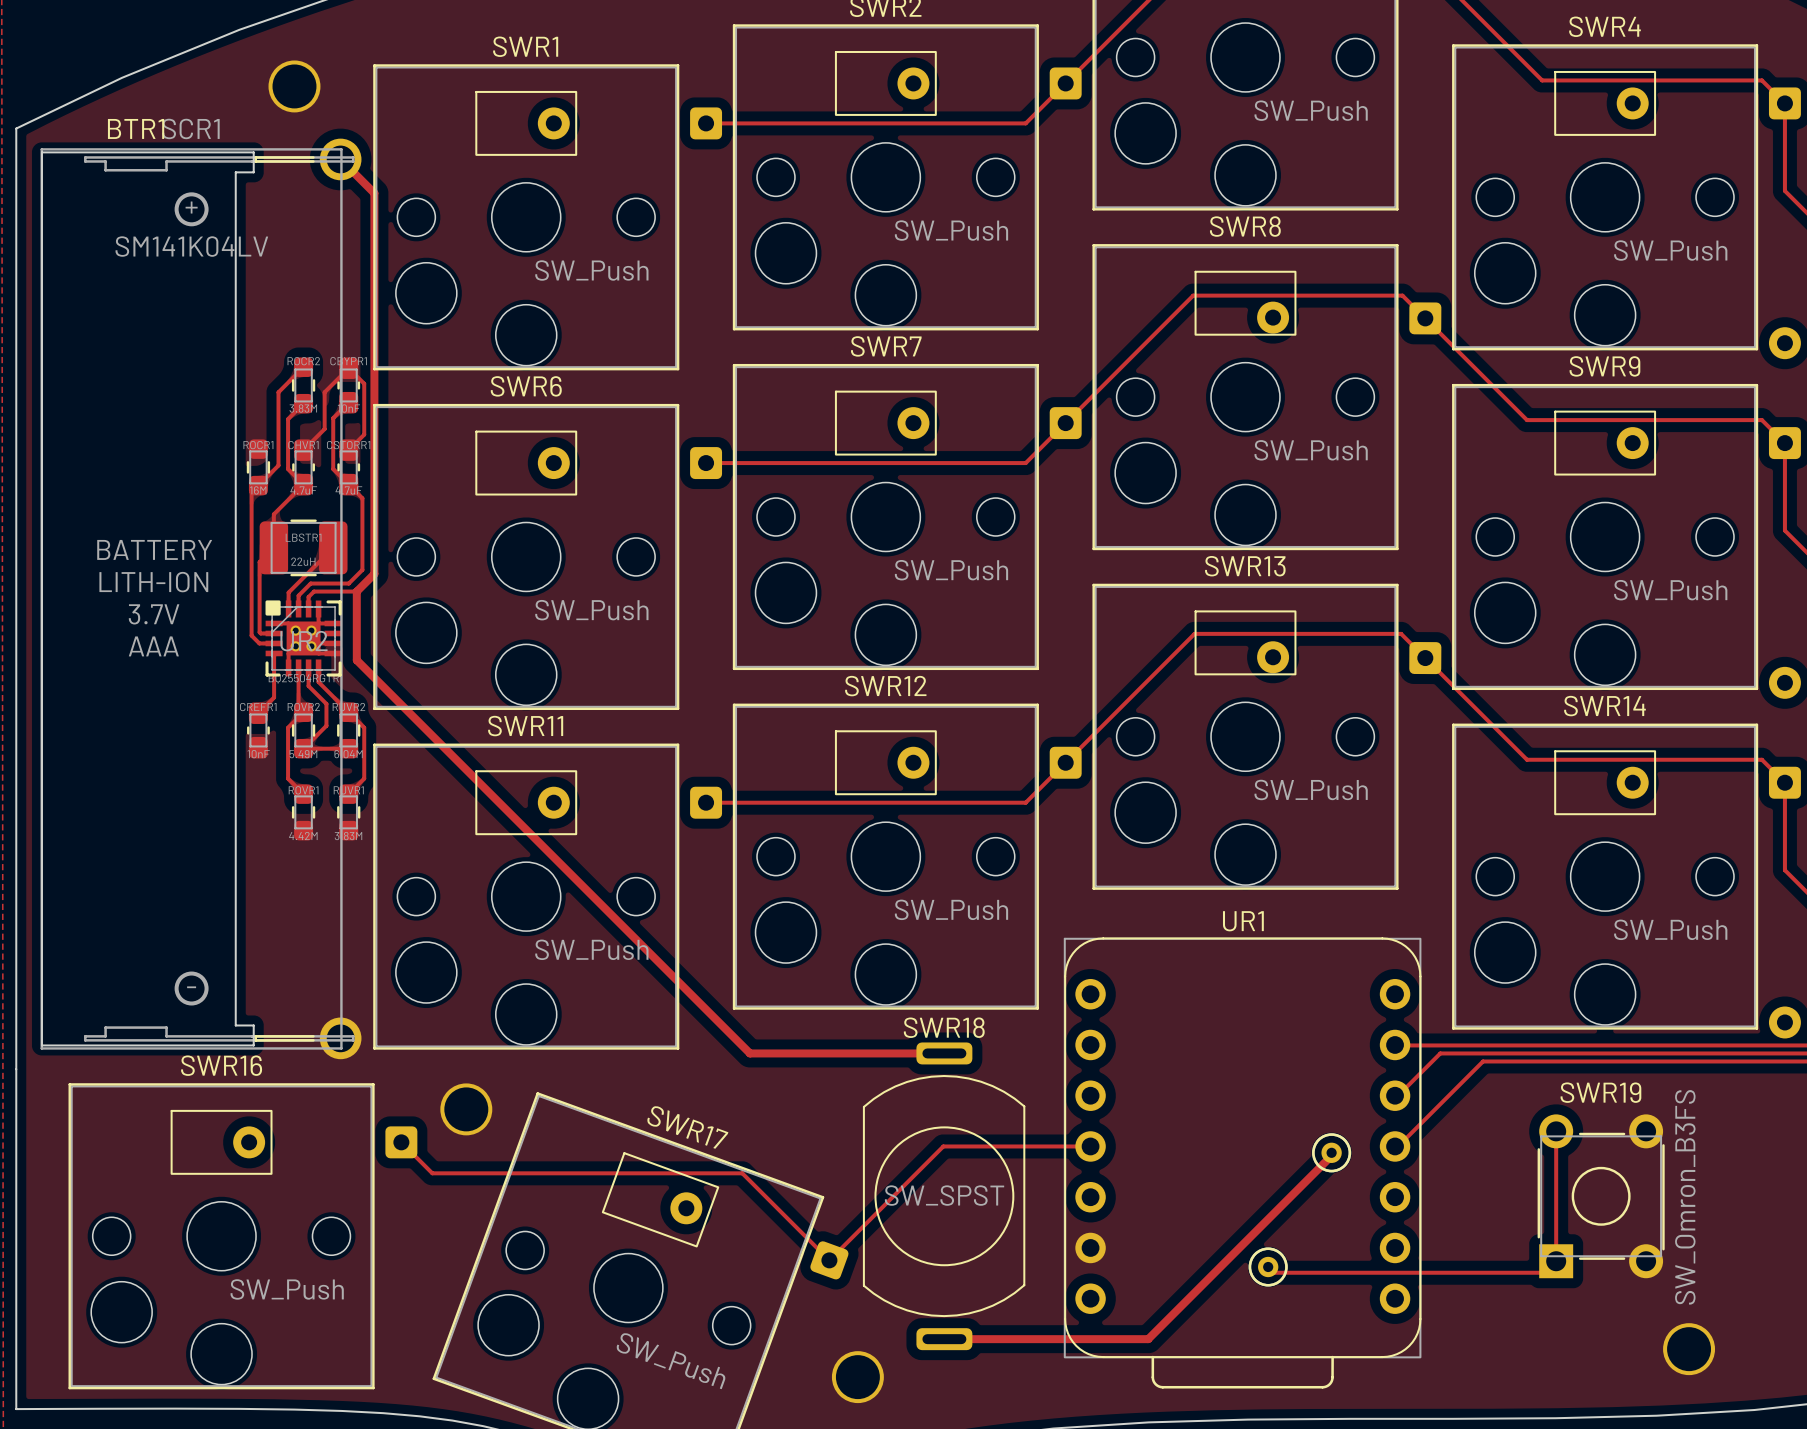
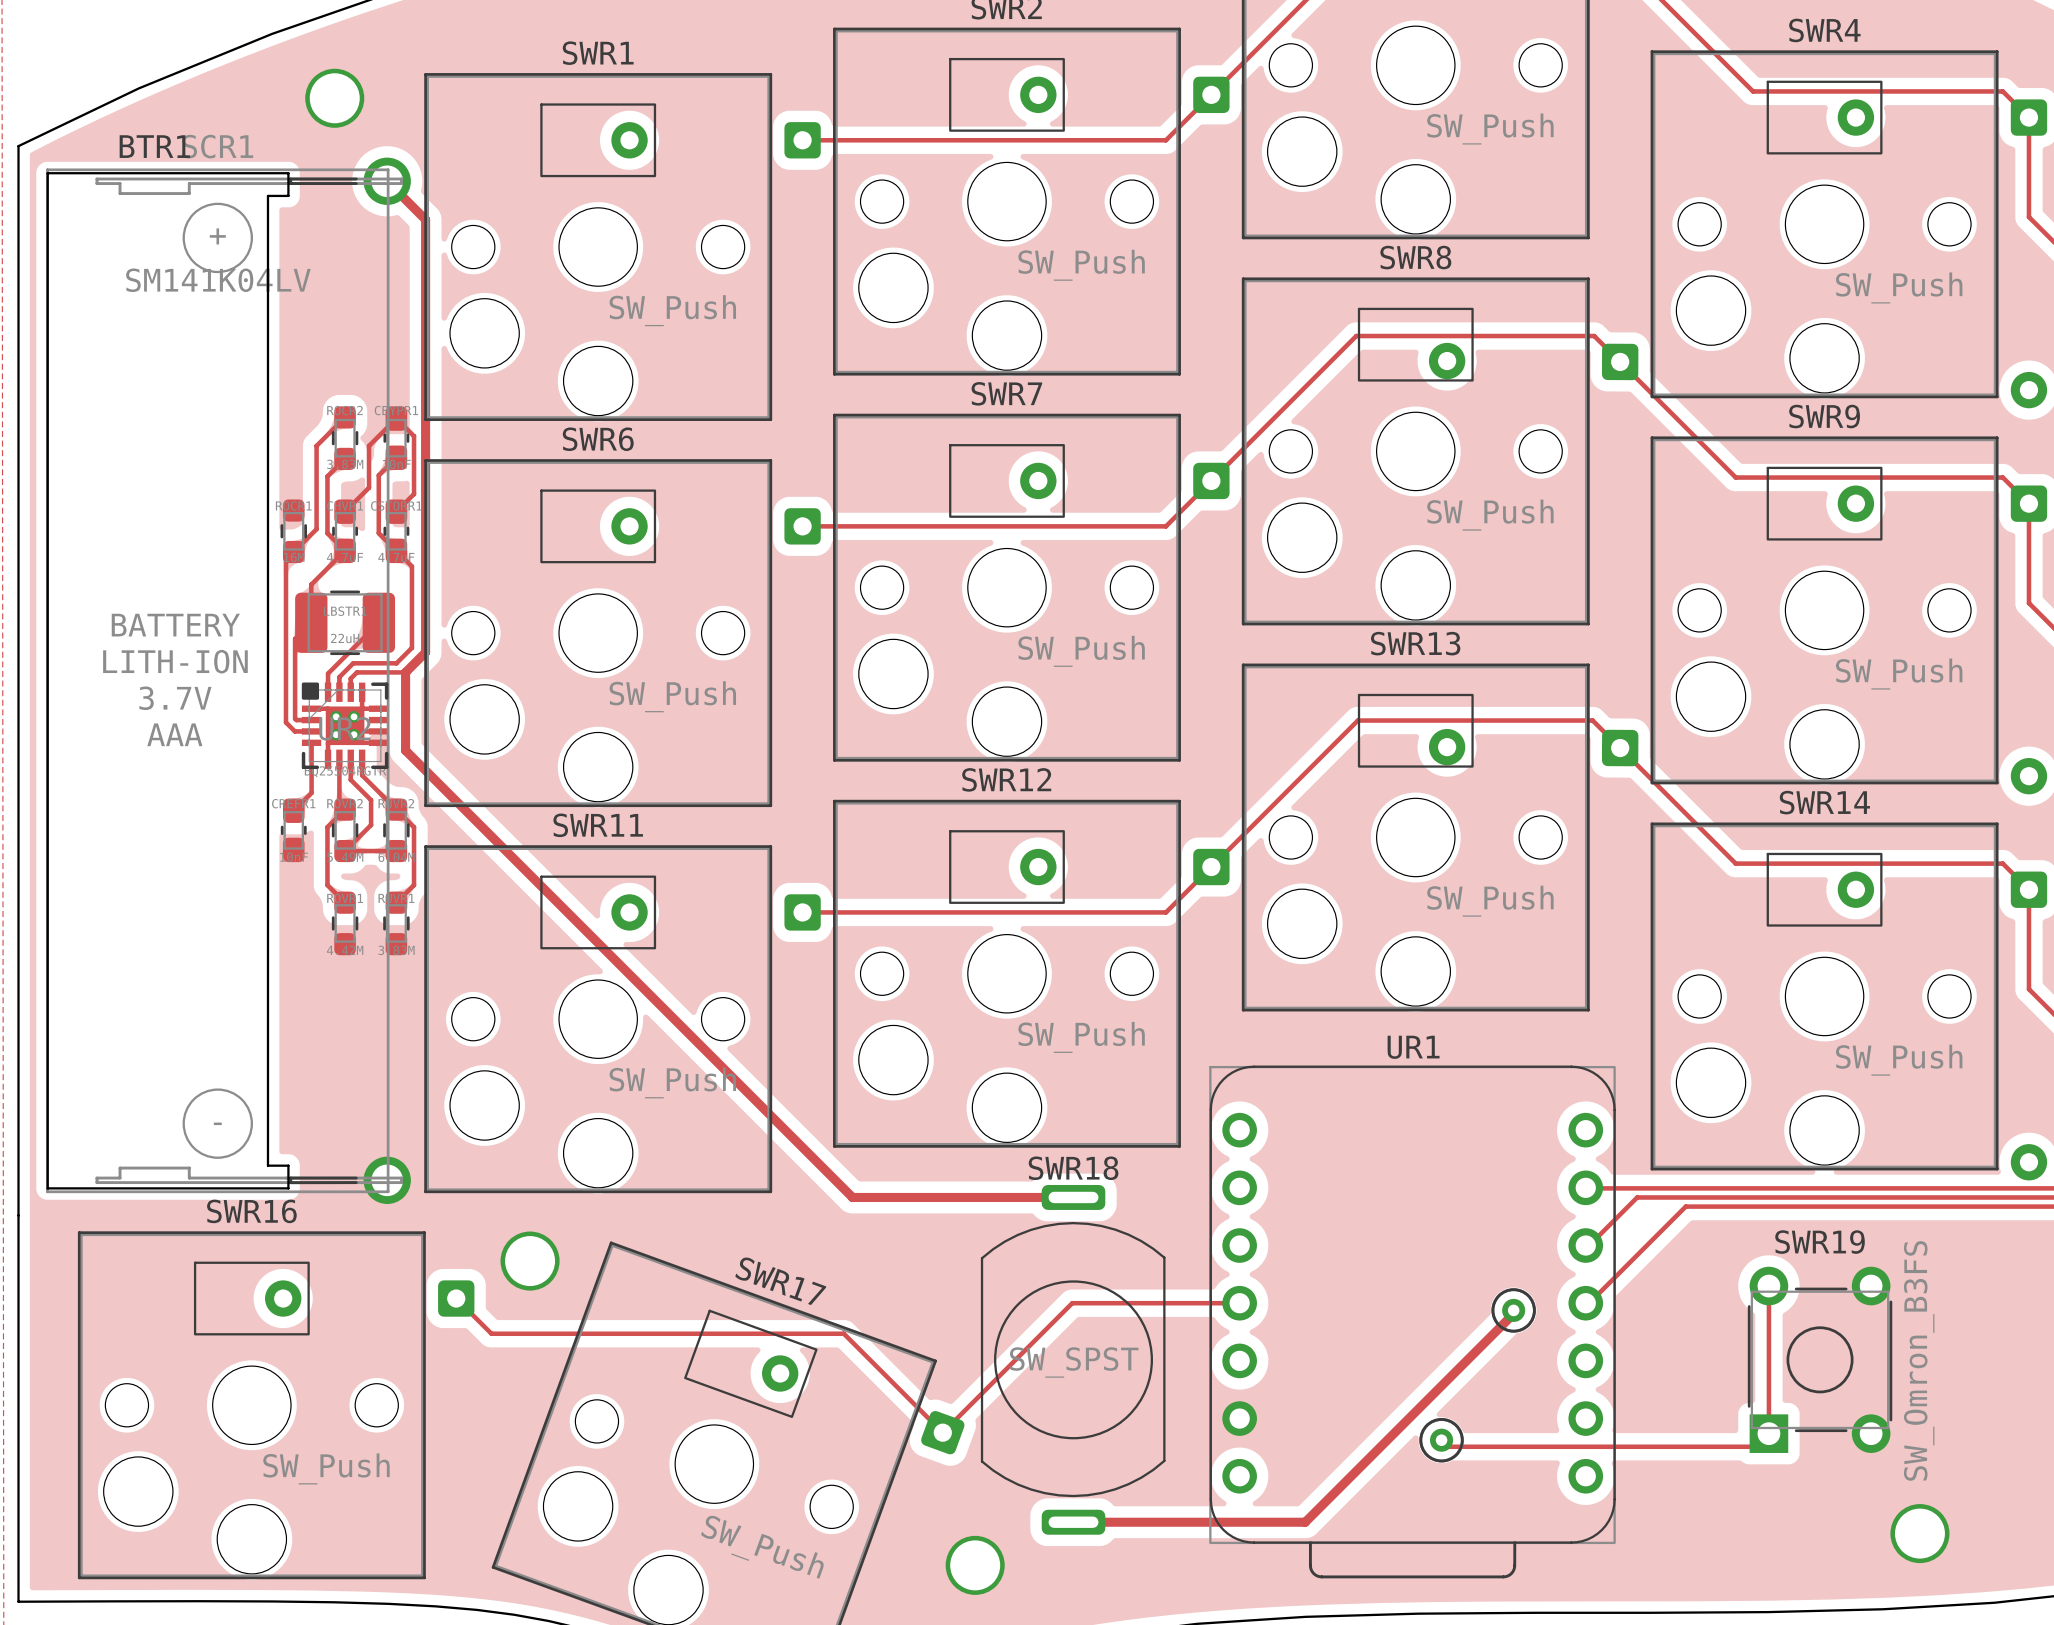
SCR1 footprint: [40, 148, 343, 1050] -> [46, 168, 390, 1194]

